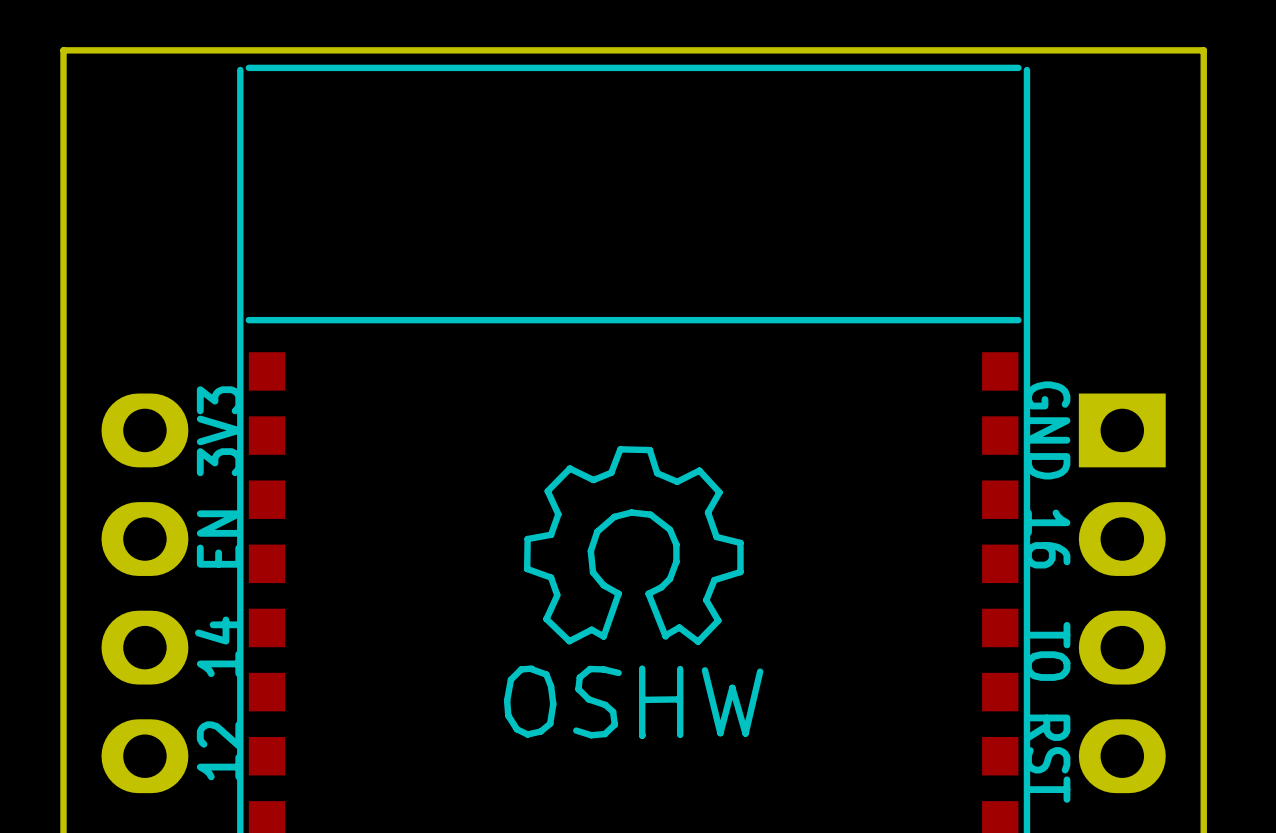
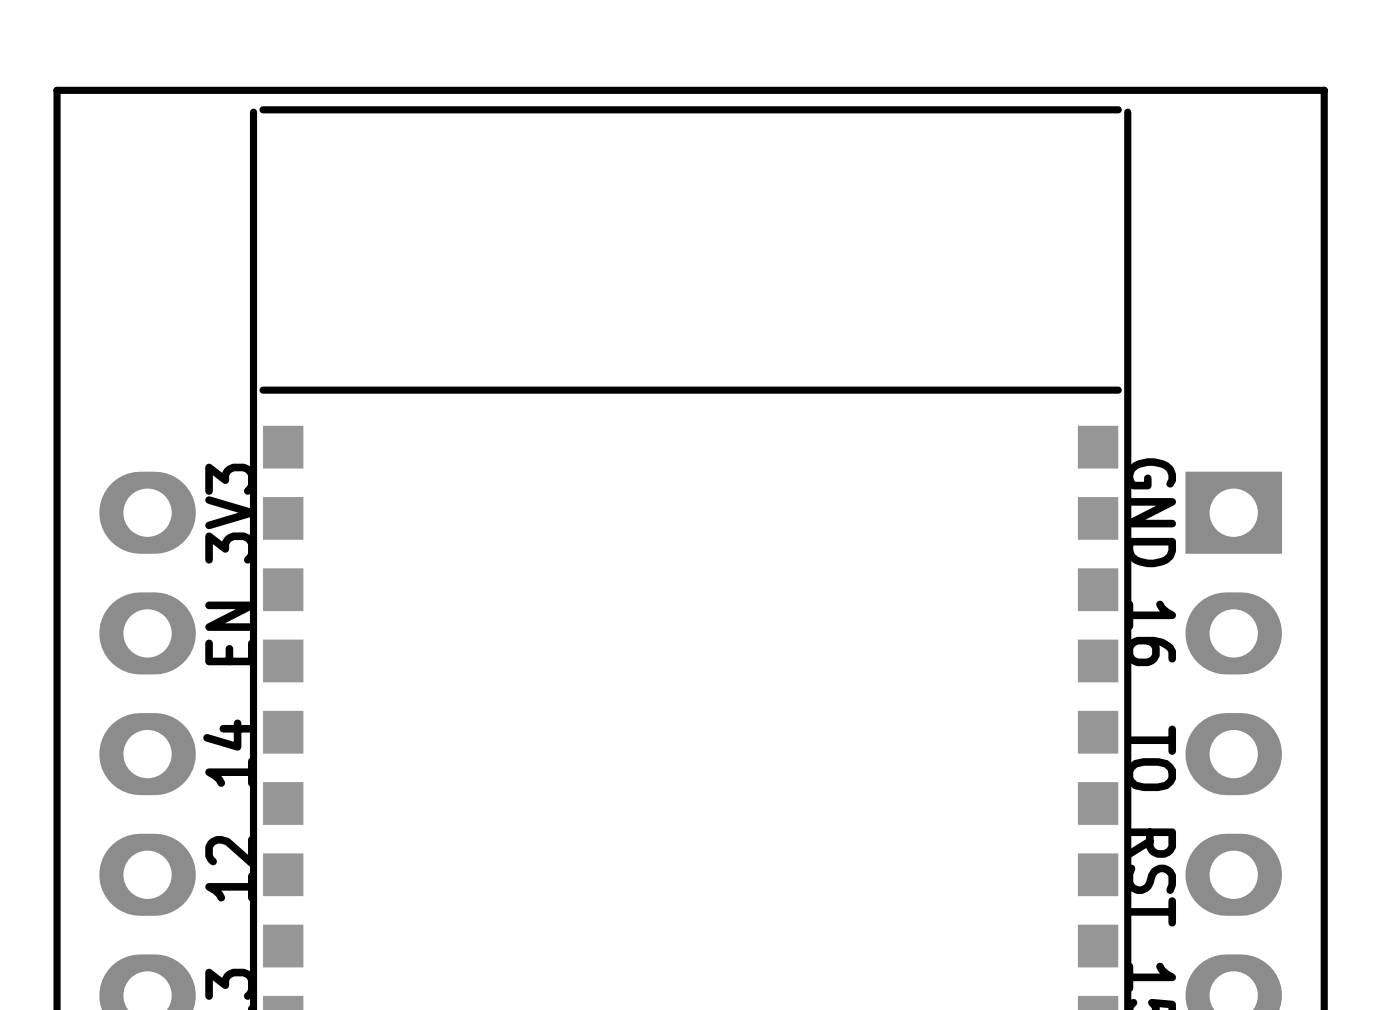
drawing: [503, 446, 764, 739] -> none

